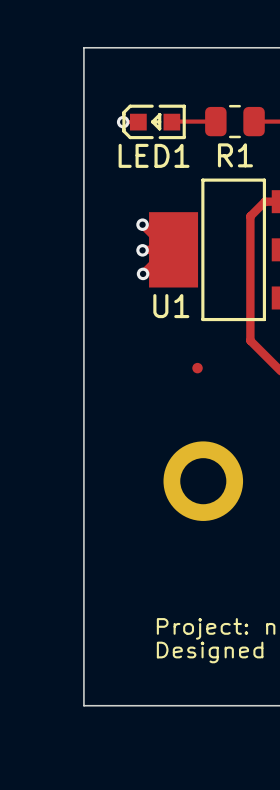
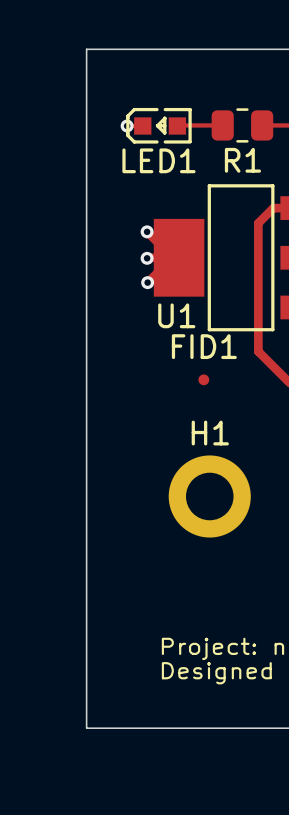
FID1 name: none -> FID1 (204, 346)
H1 name: none -> H1 (210, 433)

